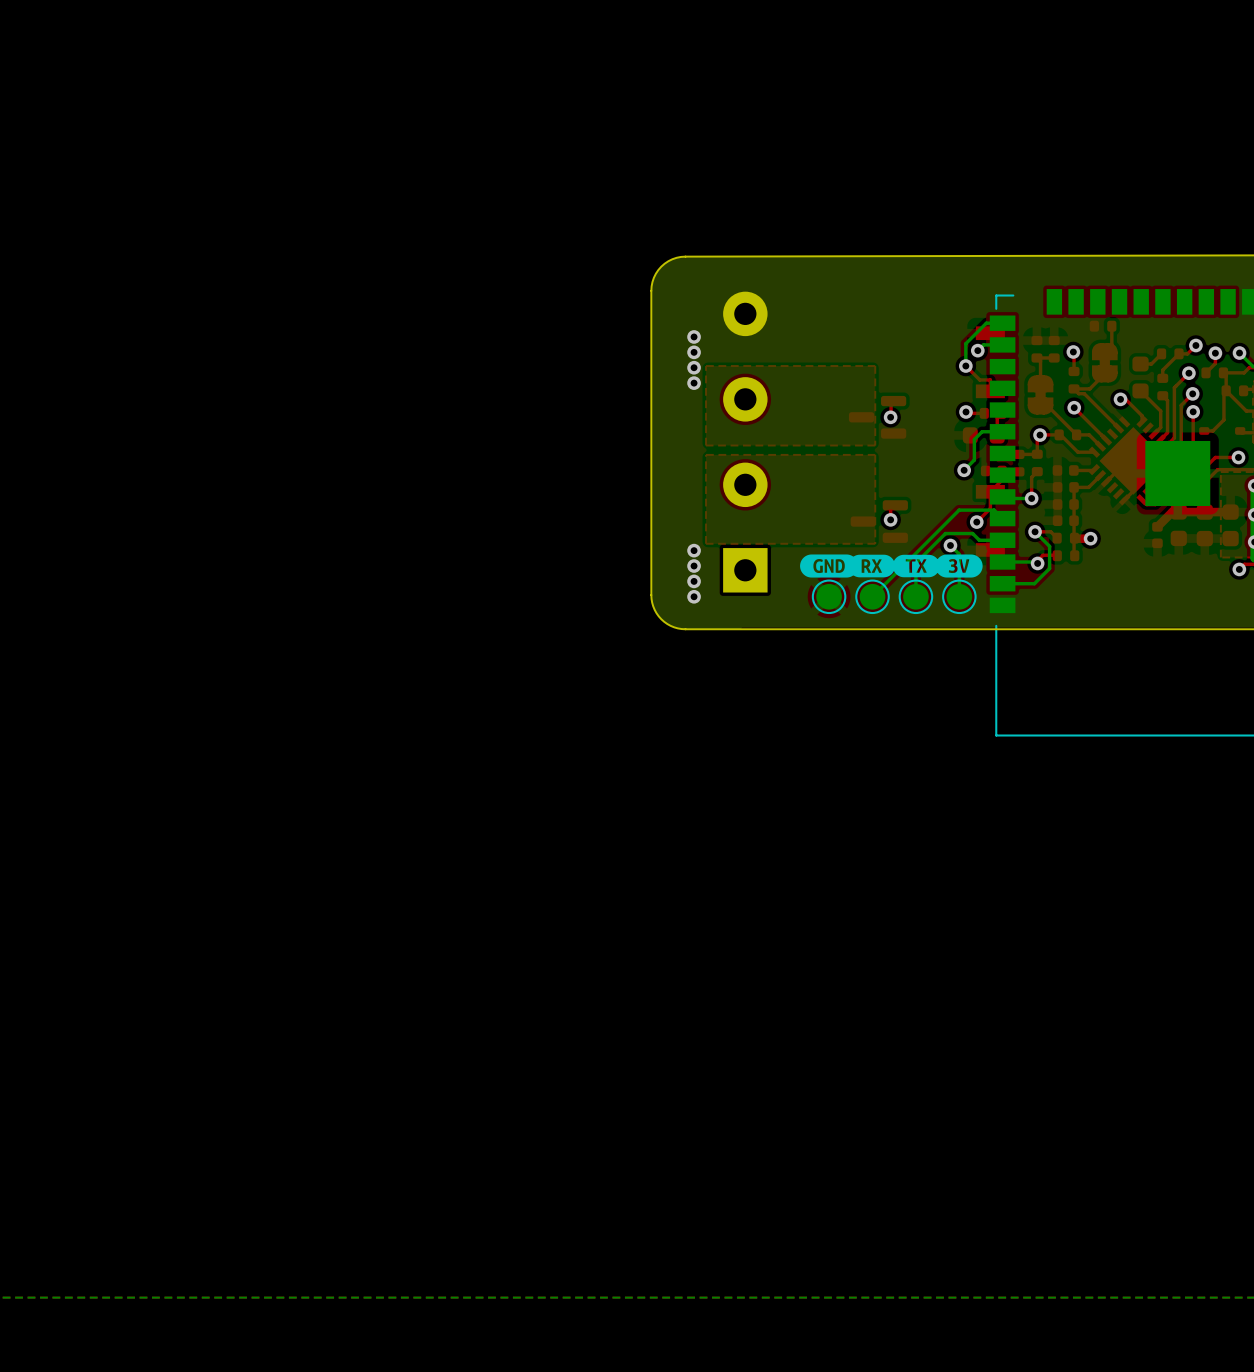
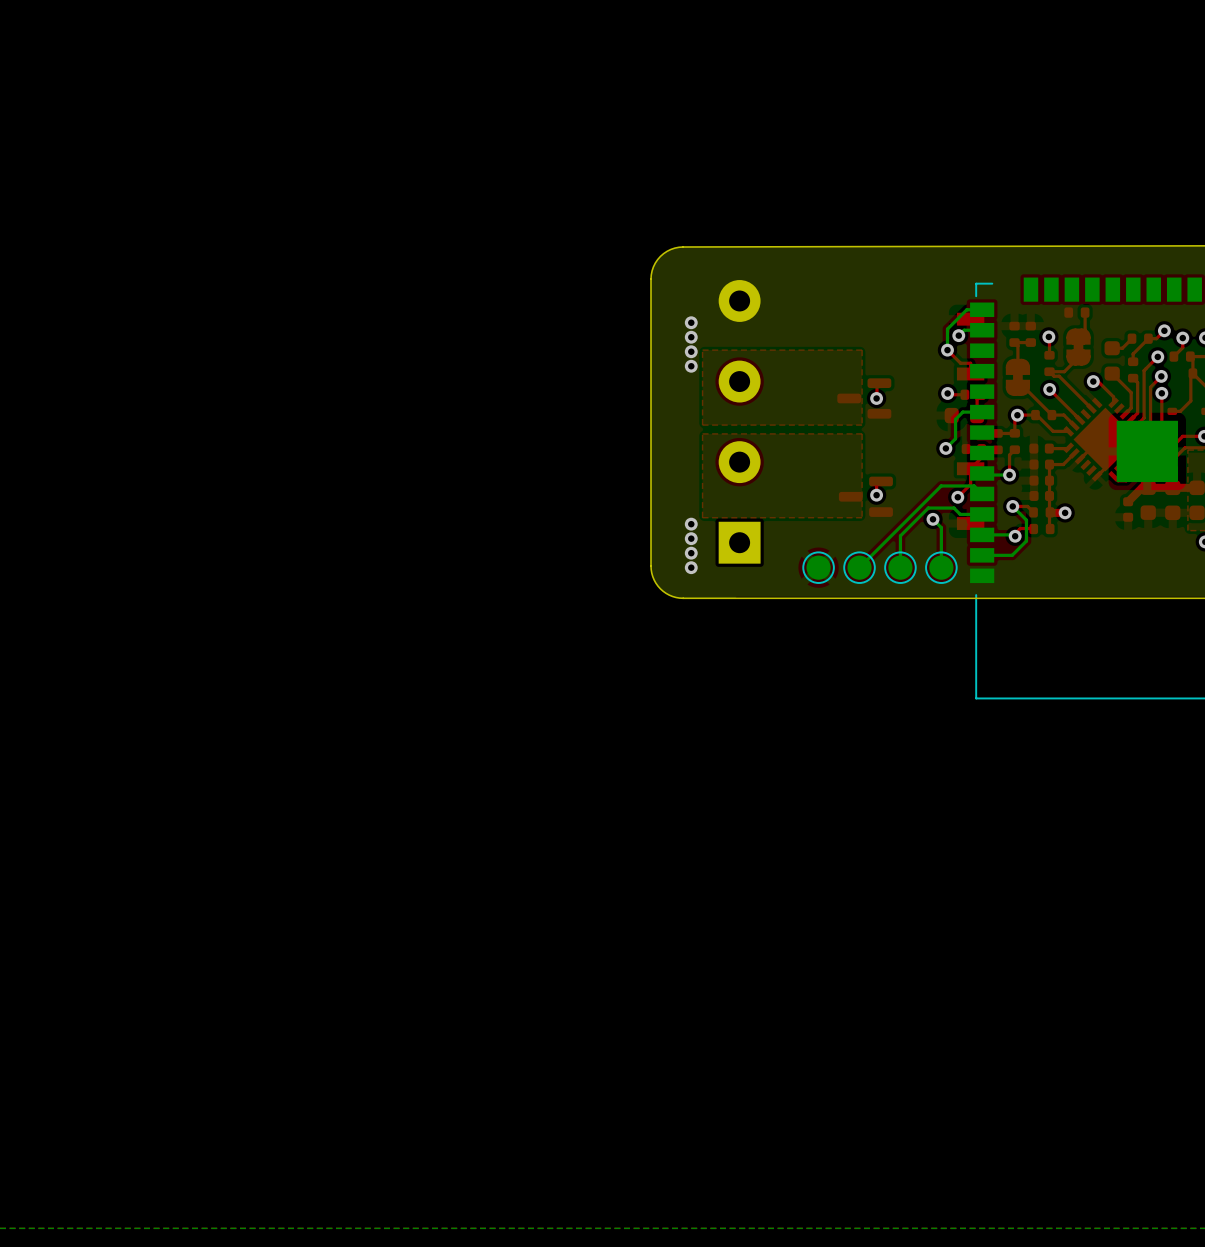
drawing: [800, 554, 983, 578] -> none

